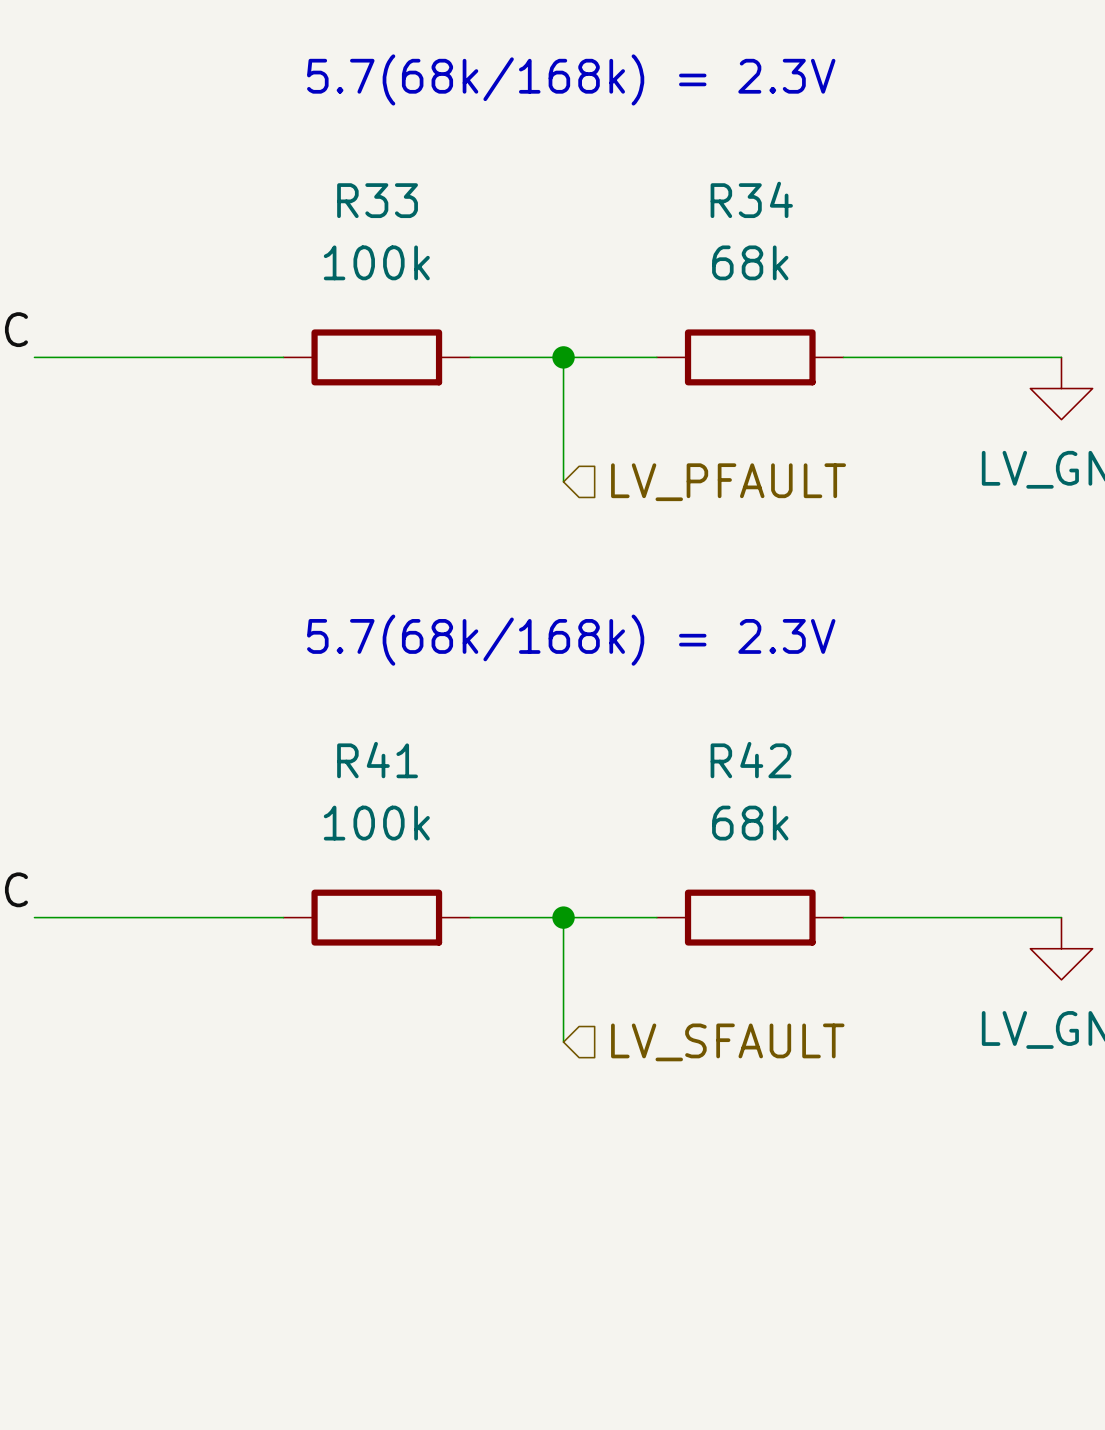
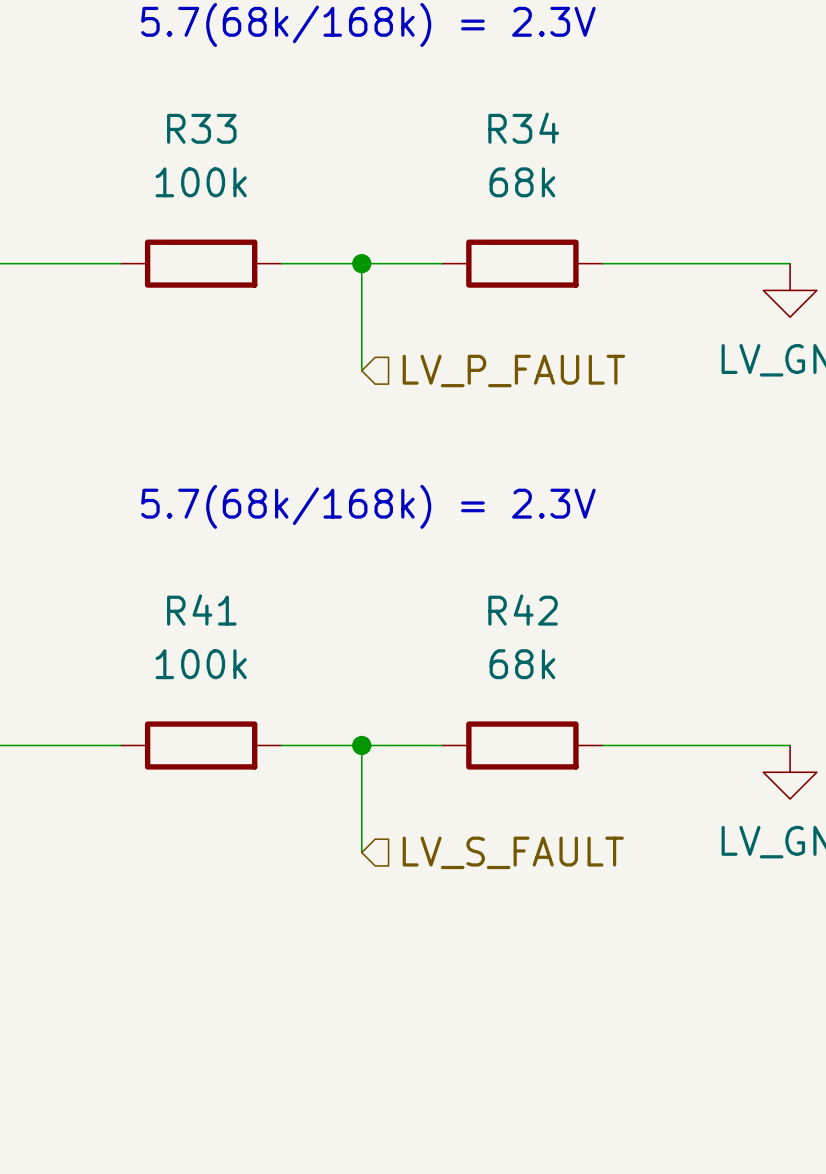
hierarchical label: LV_PFAULT (728, 482) -> LV_P_FAULT (513, 370)
hierarchical label: LV_SFAULT (727, 1042) -> LV_S_FAULT (513, 852)

